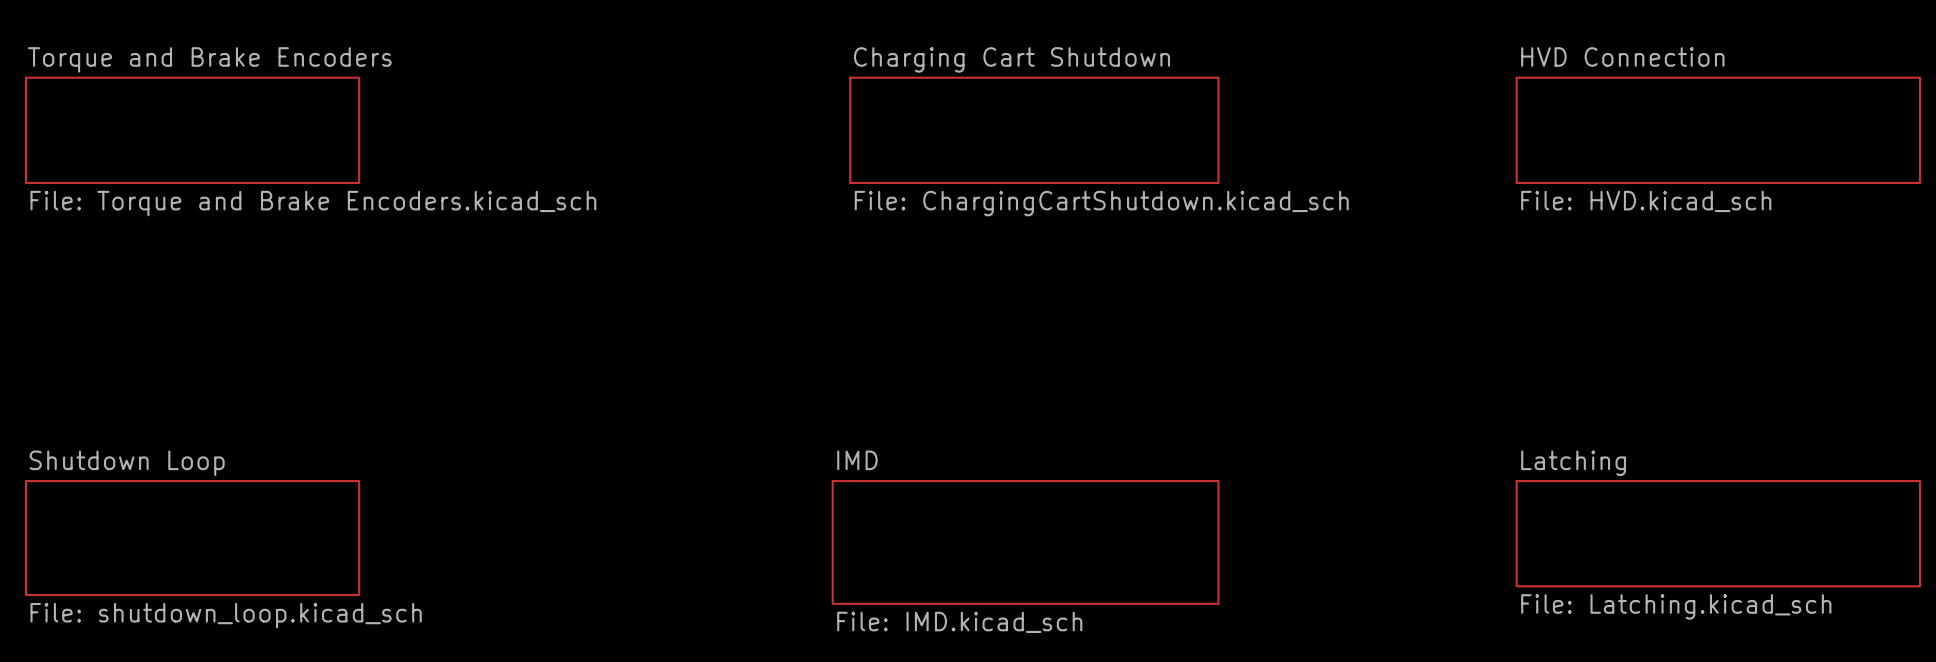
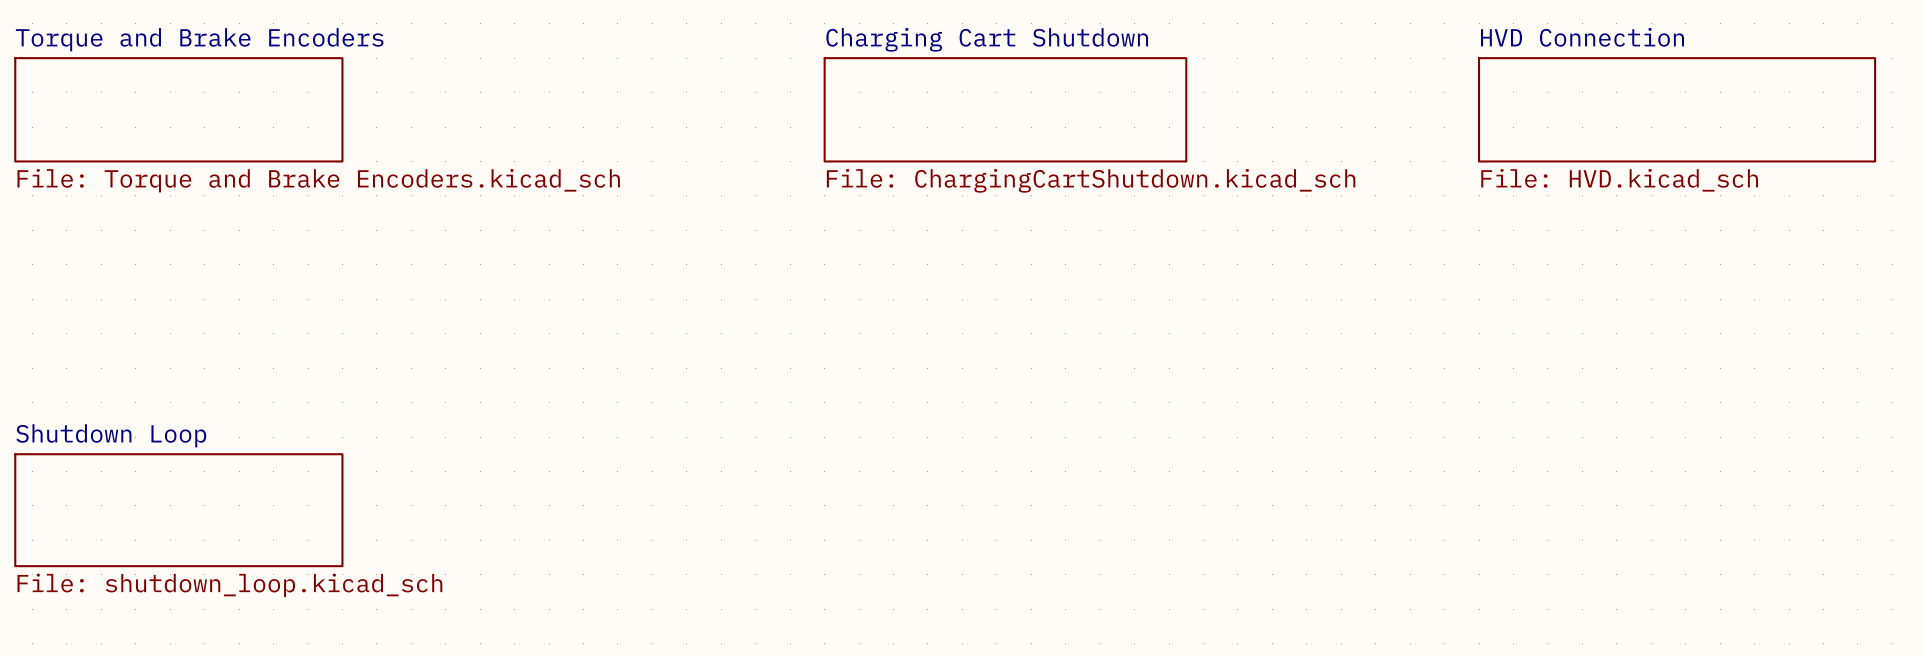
sheet Latching: File: Latching.kicad_sch (1718, 533) -> none
sheet IMD: File: IMD.kicad_sch (1025, 542) -> none

